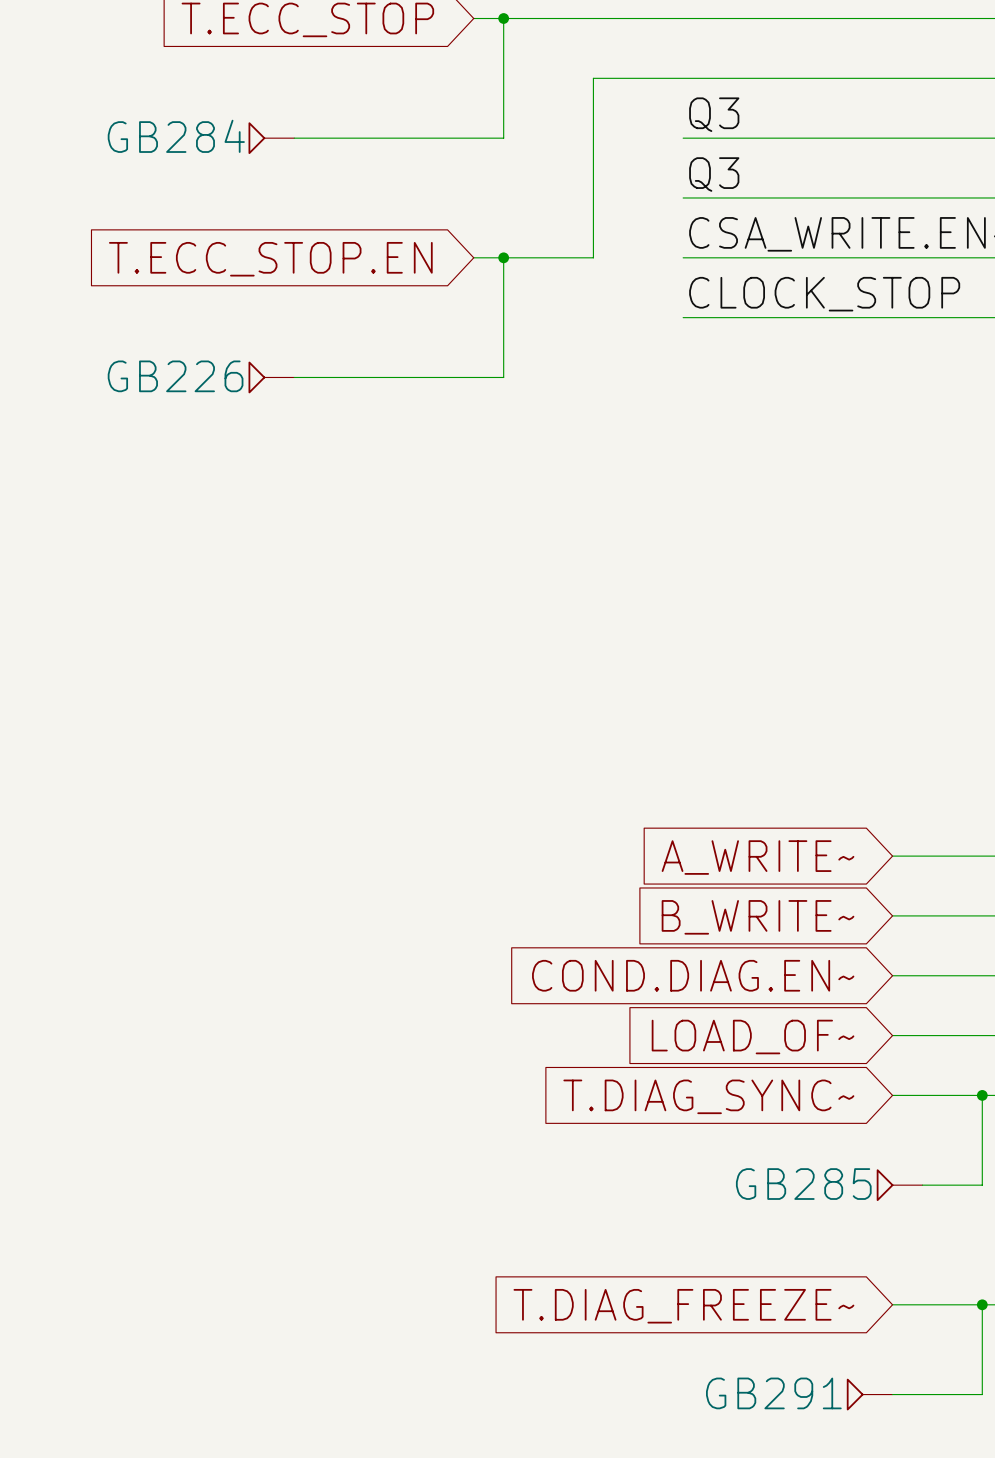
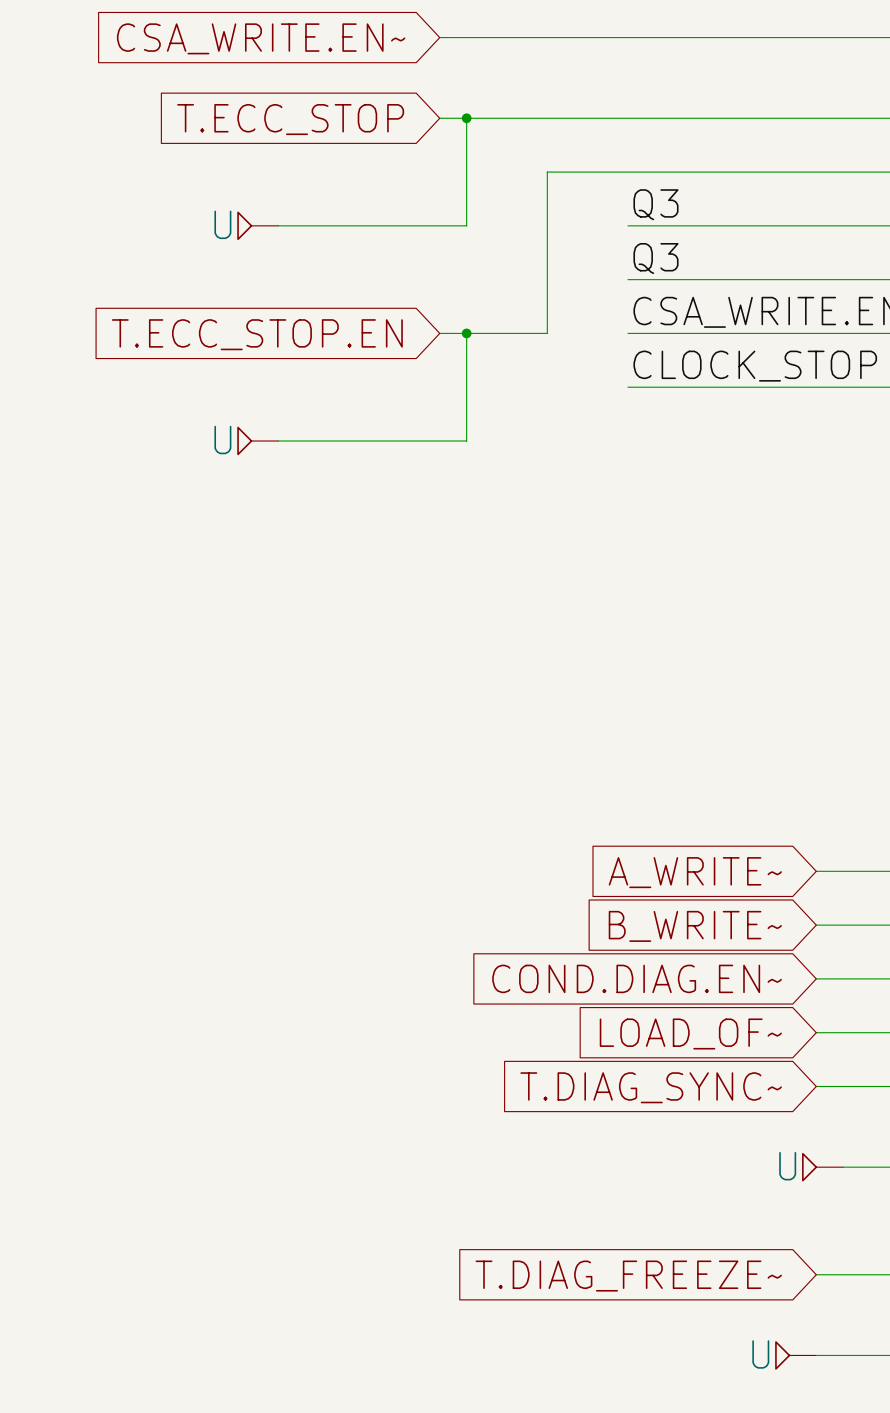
GB284 name: GB284 (176, 136) -> U (222, 224)
GB226 name: GB226 (175, 376) -> U (222, 440)
GB285 name: GB285 (803, 1184) -> U (787, 1166)
GB291 name: GB291 (773, 1393) -> U (760, 1354)

